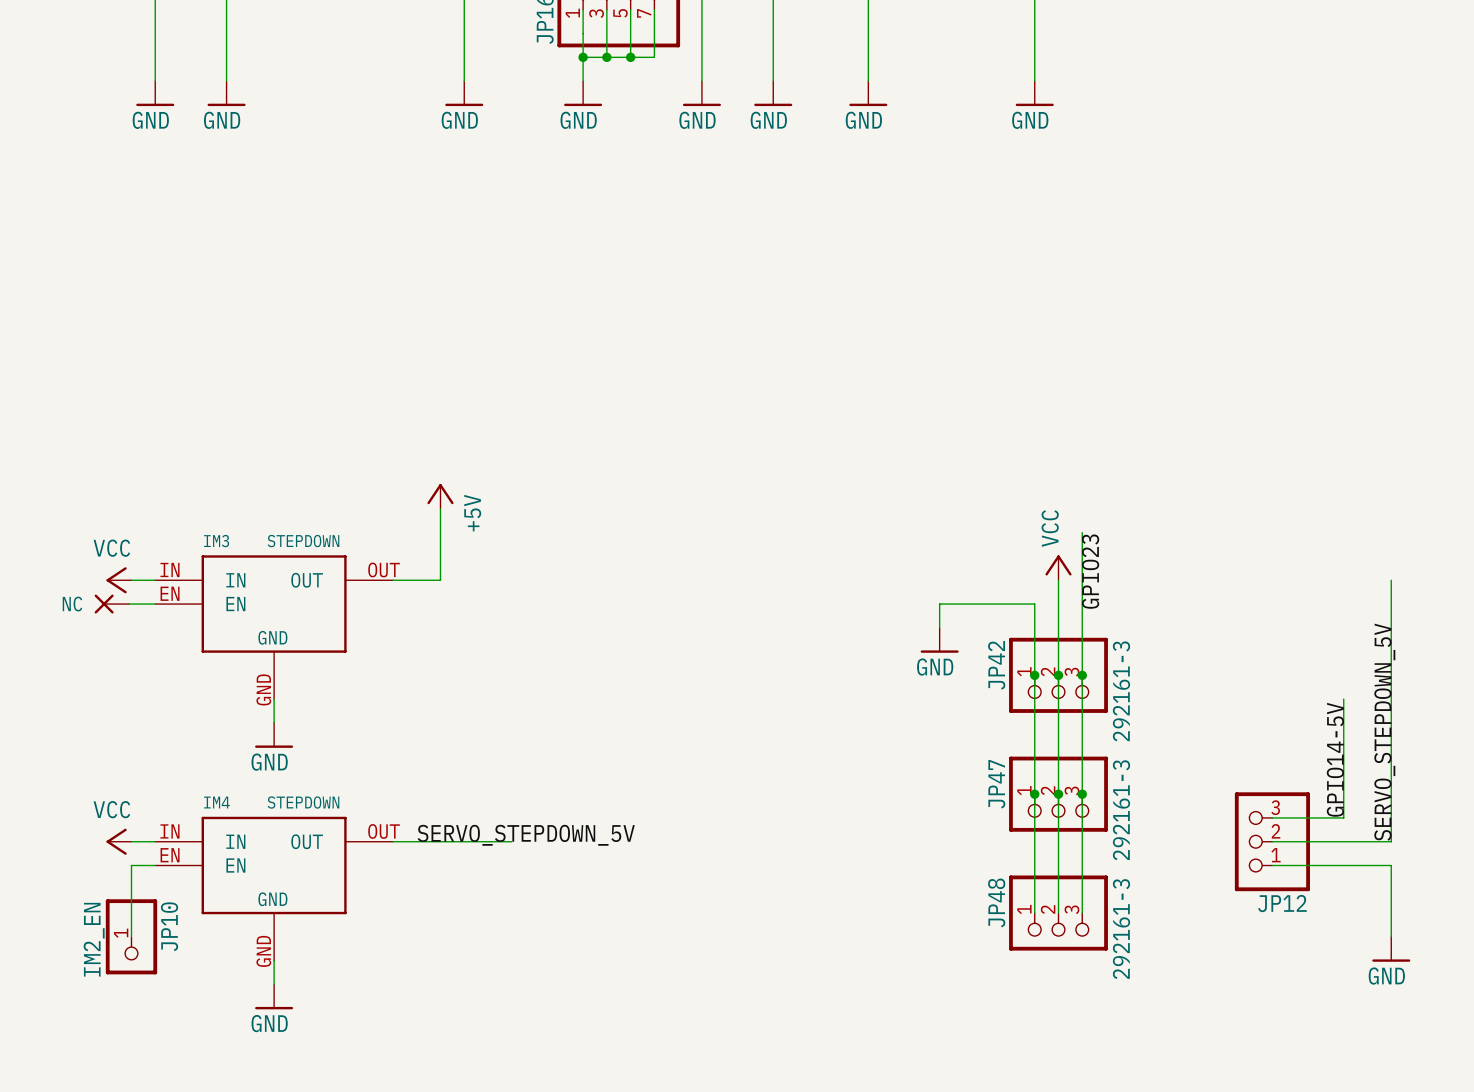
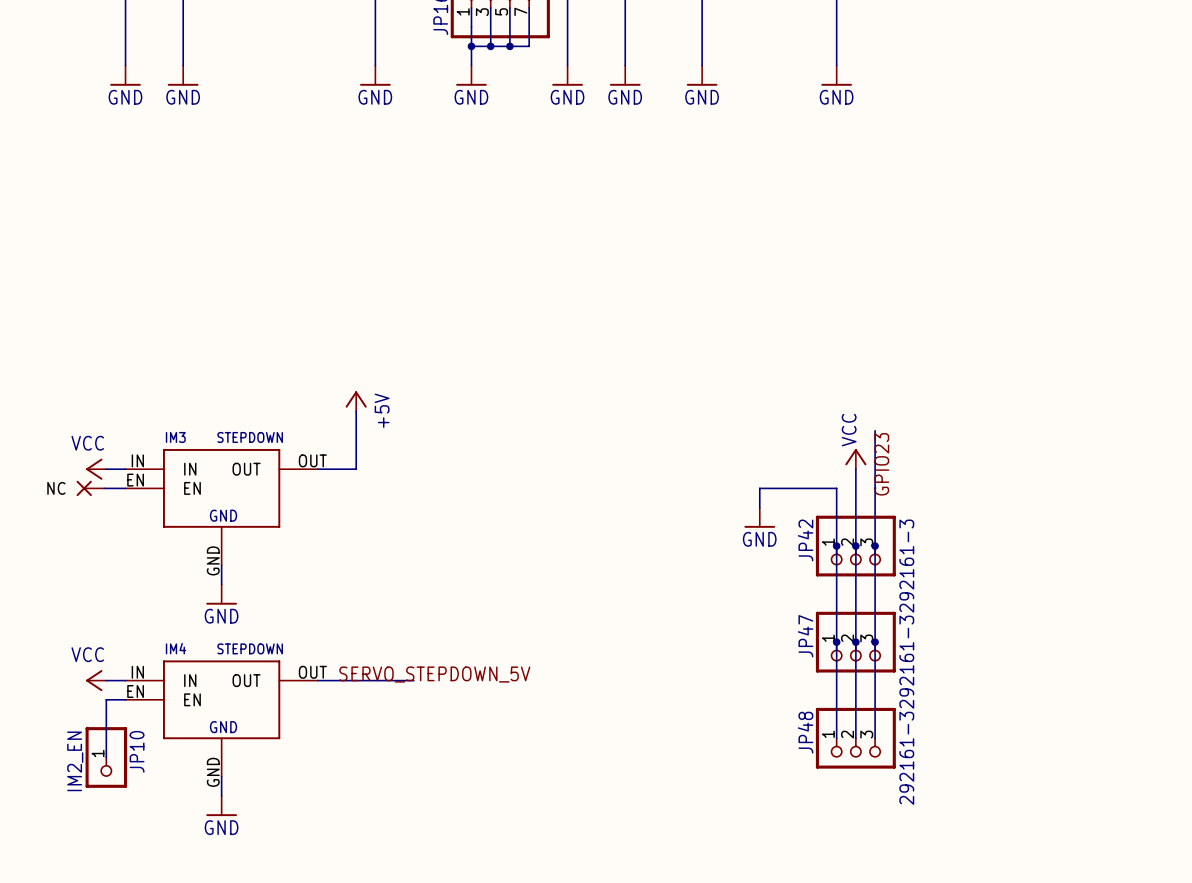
wire: (1391, 580) (1391, 841) (1272, 841) -> none
wire: (1343, 699) (1343, 817) (1272, 817) -> none
label: SERVO_STEPDOWN_5V (1384, 732) -> none
label: GPIO14-5V (1335, 759) -> none
JP12: (1272, 841) -> none
wire: (1272, 865) (1391, 865) (1391, 936) -> none
power symbol: GND (1391, 949) -> none

